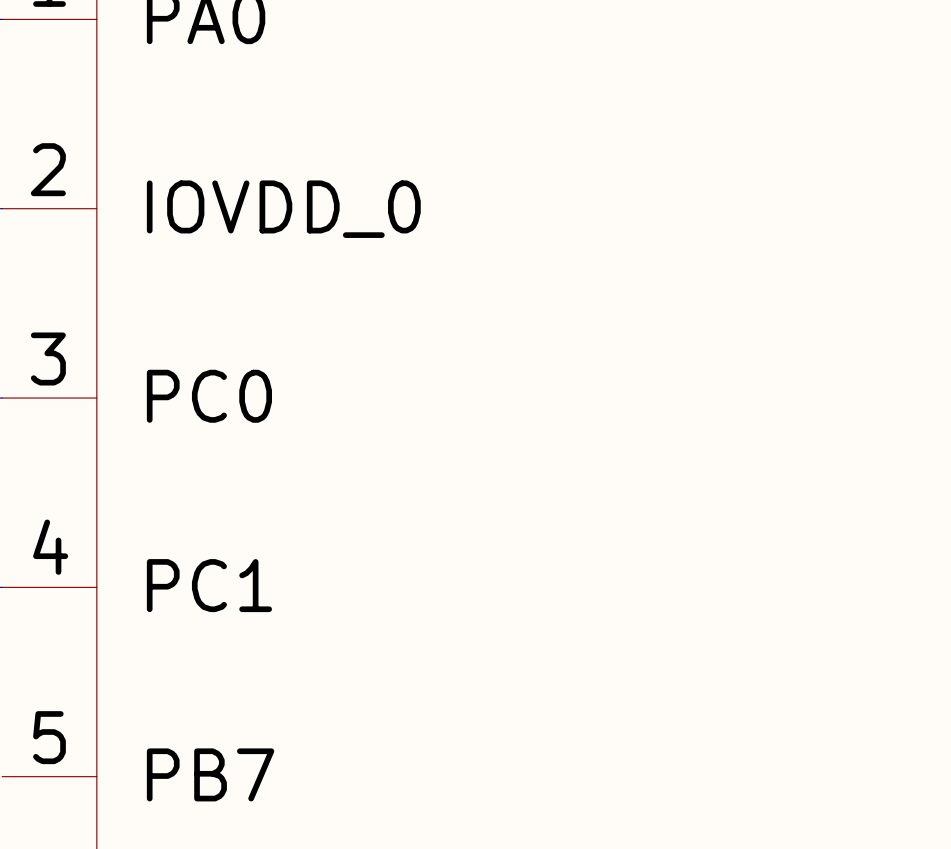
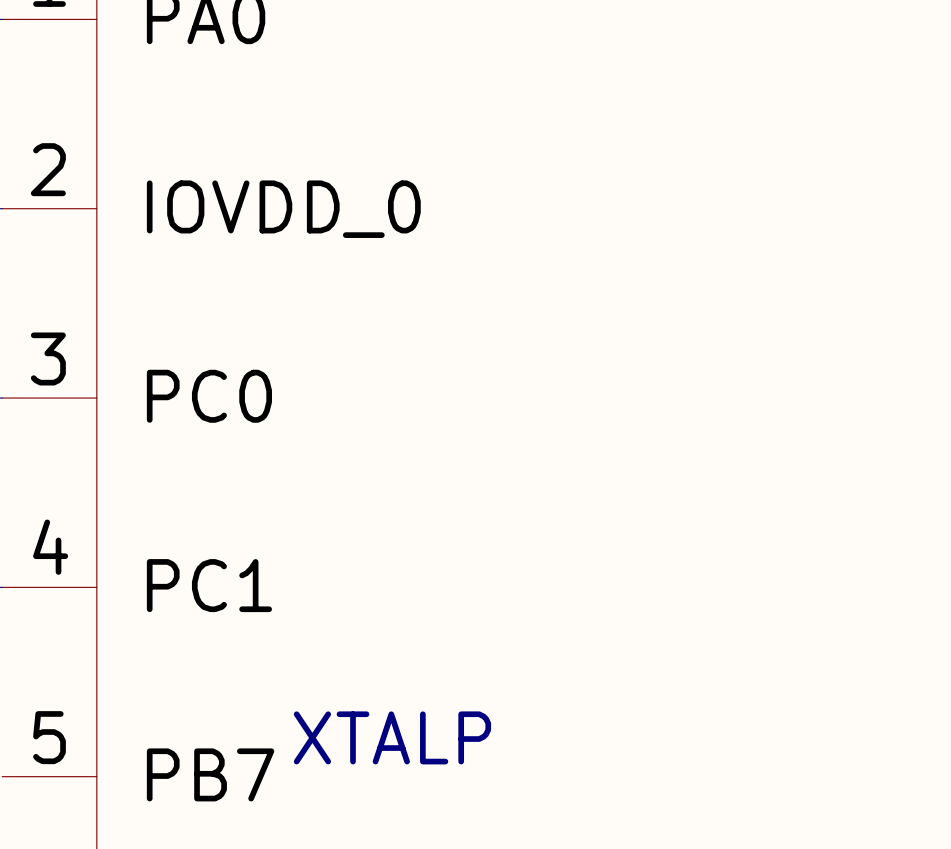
text: none -> XTALP (392, 737)

